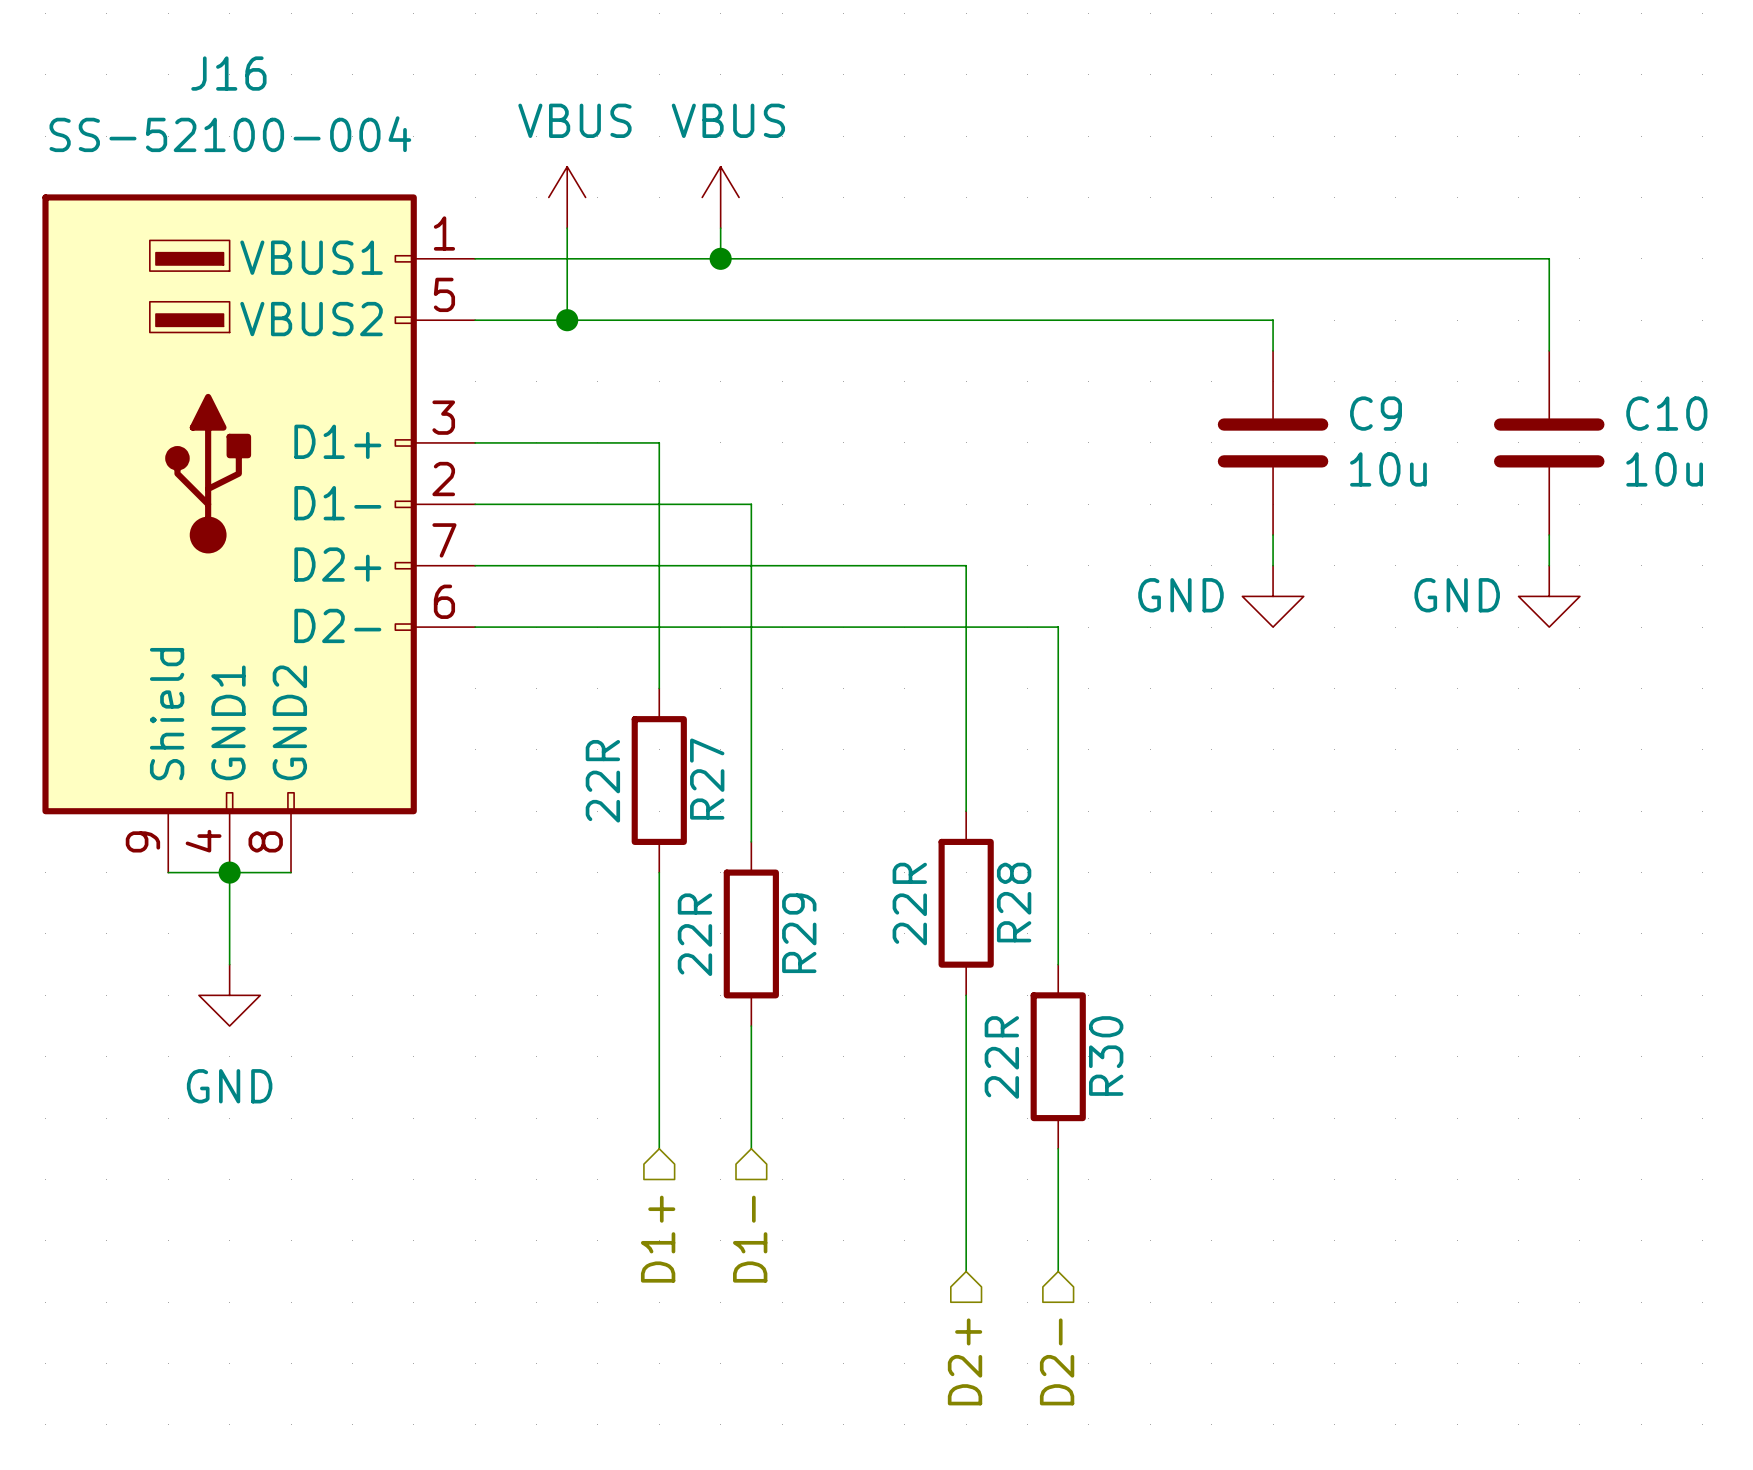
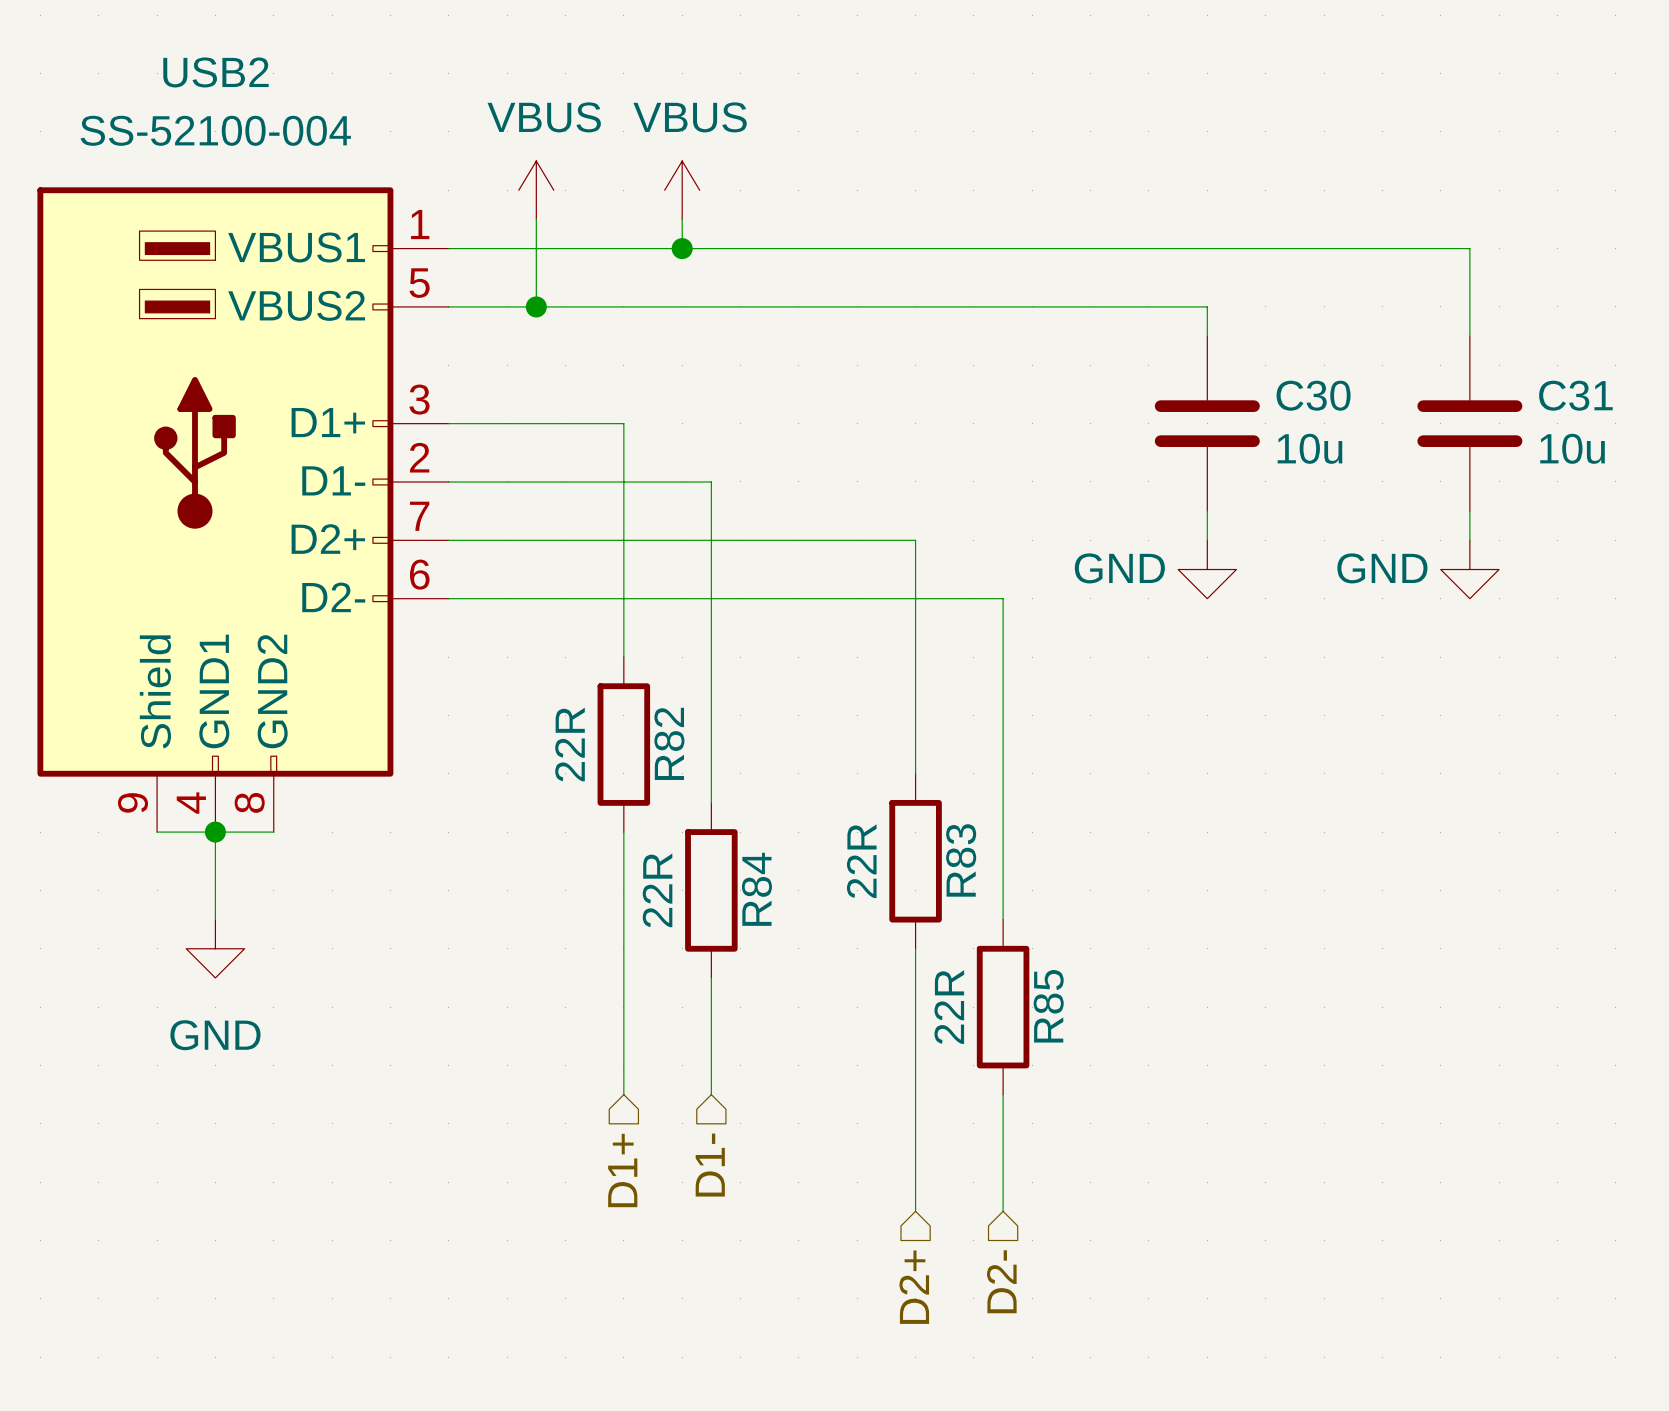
J16 name: J16 (228, 73) -> USB2 (215, 72)
C9 name: C9 (1376, 413) -> C30 (1313, 395)
C10 name: C10 (1666, 413) -> C31 (1575, 395)
R27 name: R27 (707, 779) -> R82 (669, 743)
R28 name: R28 (1014, 902) -> R83 (961, 860)
R29 name: R29 (799, 933) -> R84 (756, 889)
R30 name: R30 (1106, 1056) -> R85 (1048, 1006)

